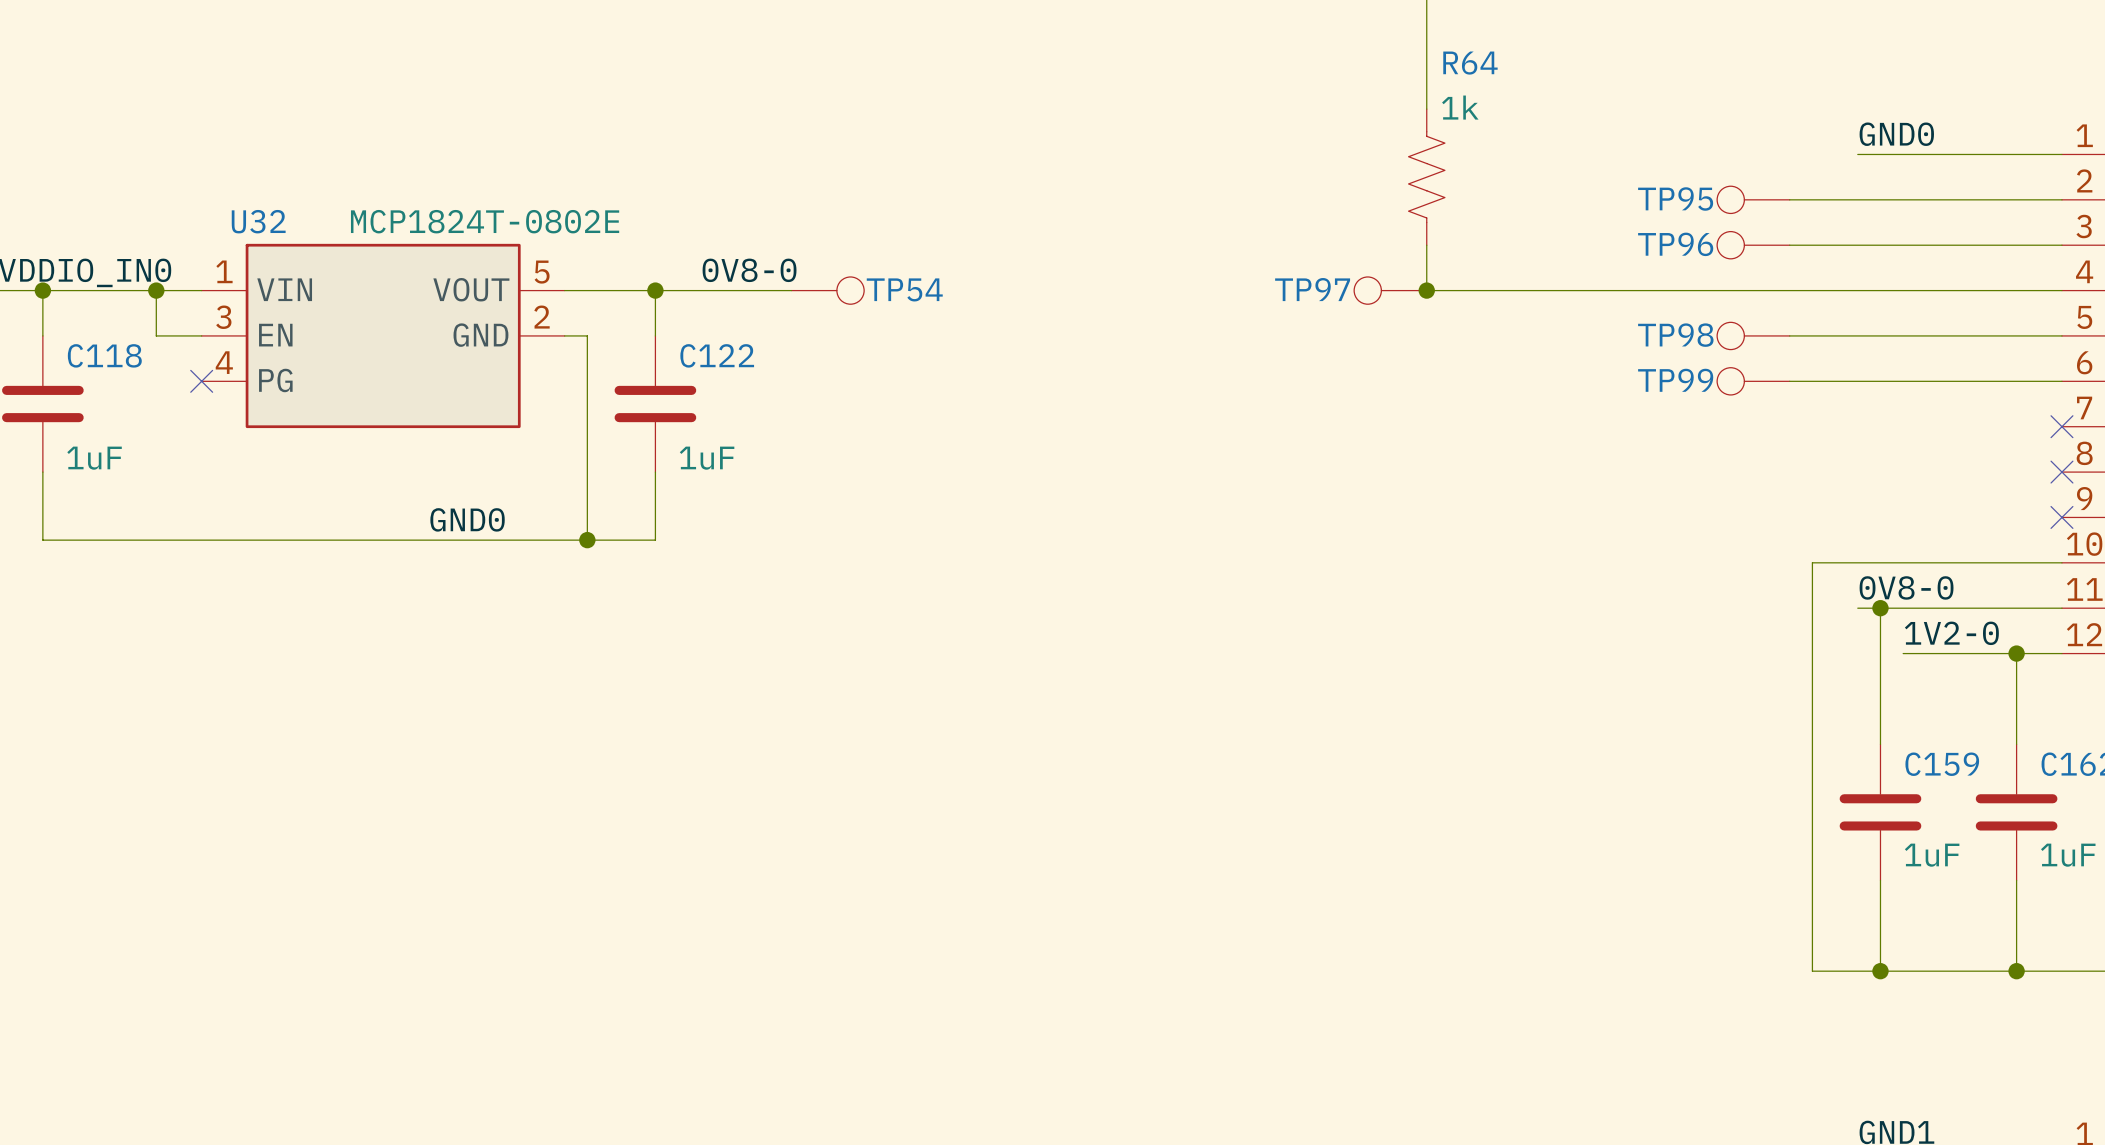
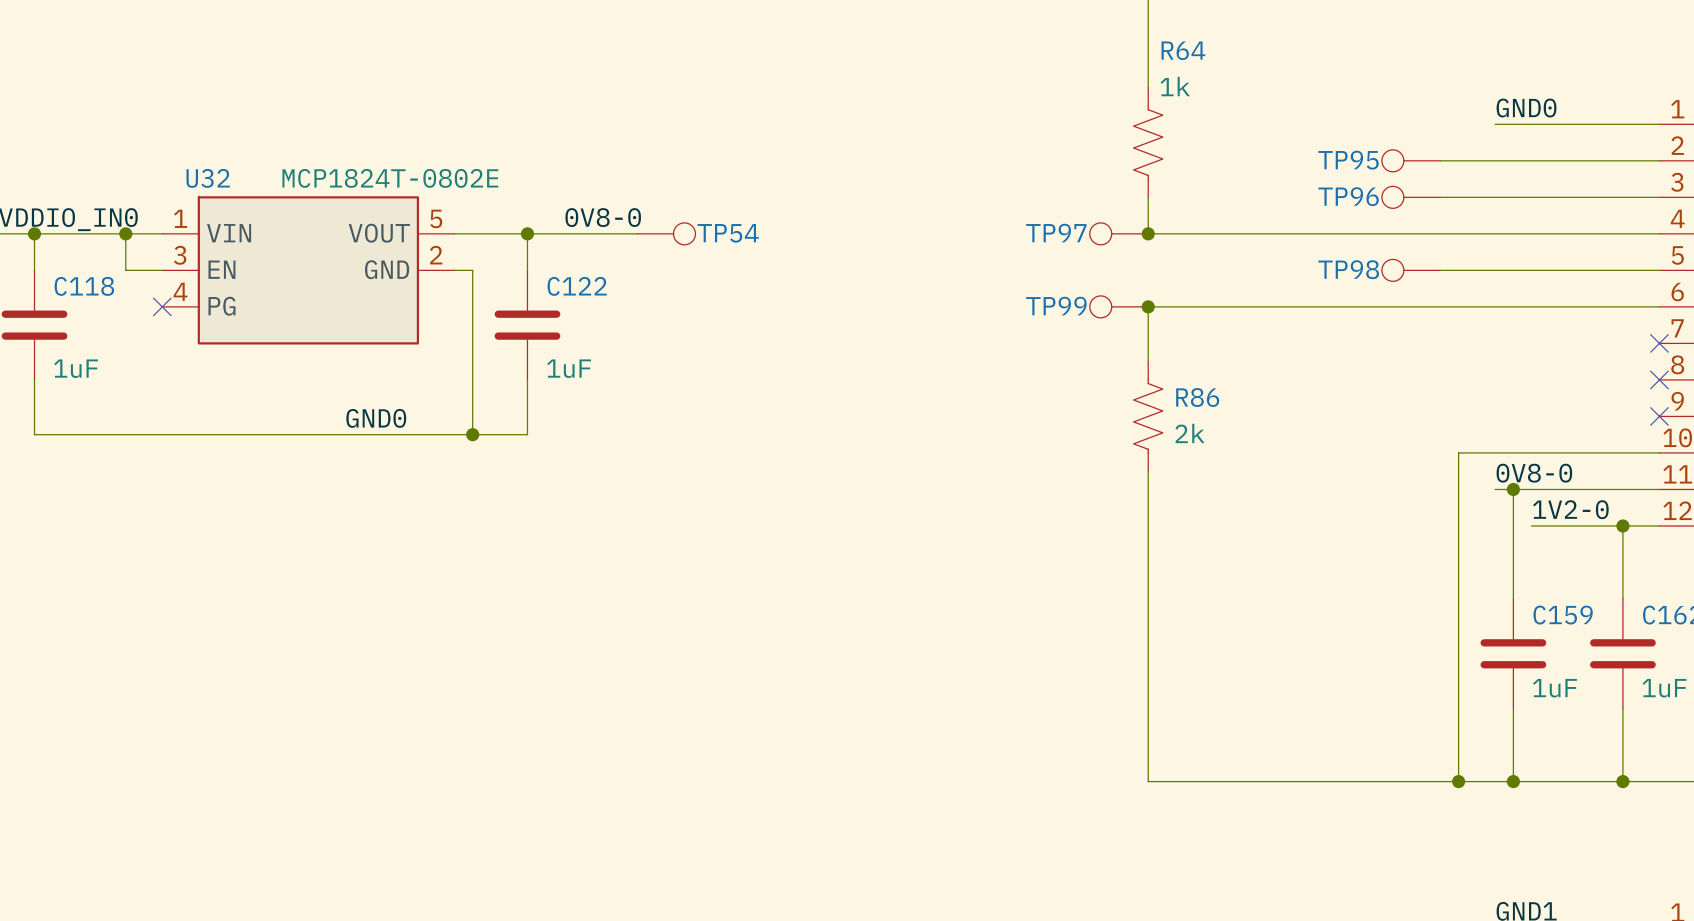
junction: none -> (1148, 306)
TP99 position: (1753, 381) -> (1119, 306)
wire: none -> (1440, 306) (1148, 306) (1148, 361)
R86: none -> 2k (1148, 416)
wire: none -> (1148, 471) (1148, 781) (1458, 781)
junction: none -> (1458, 781)

